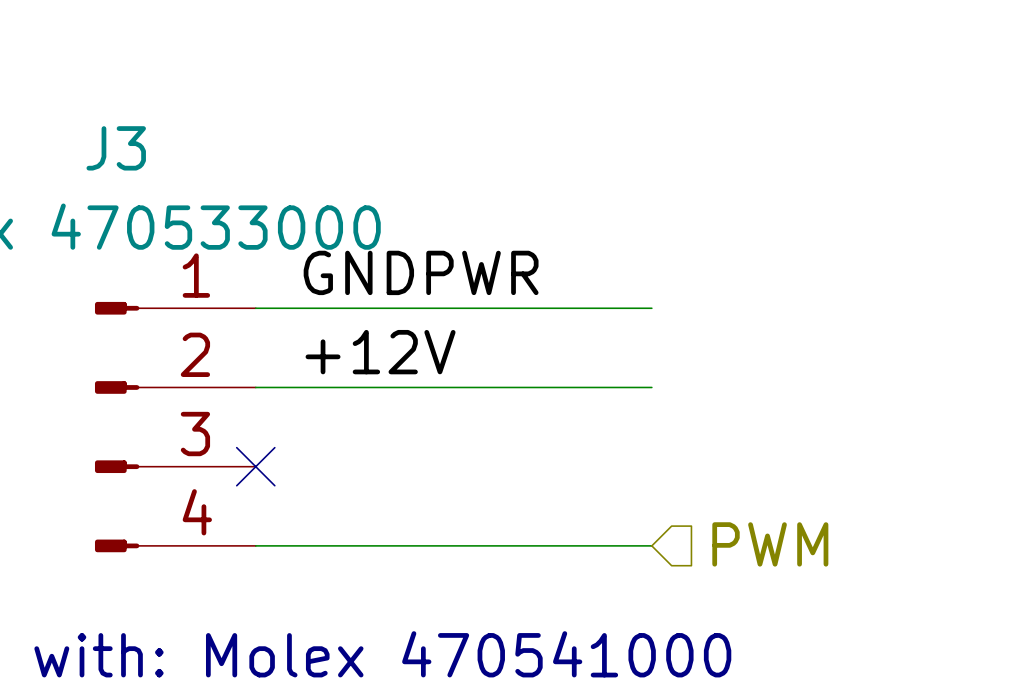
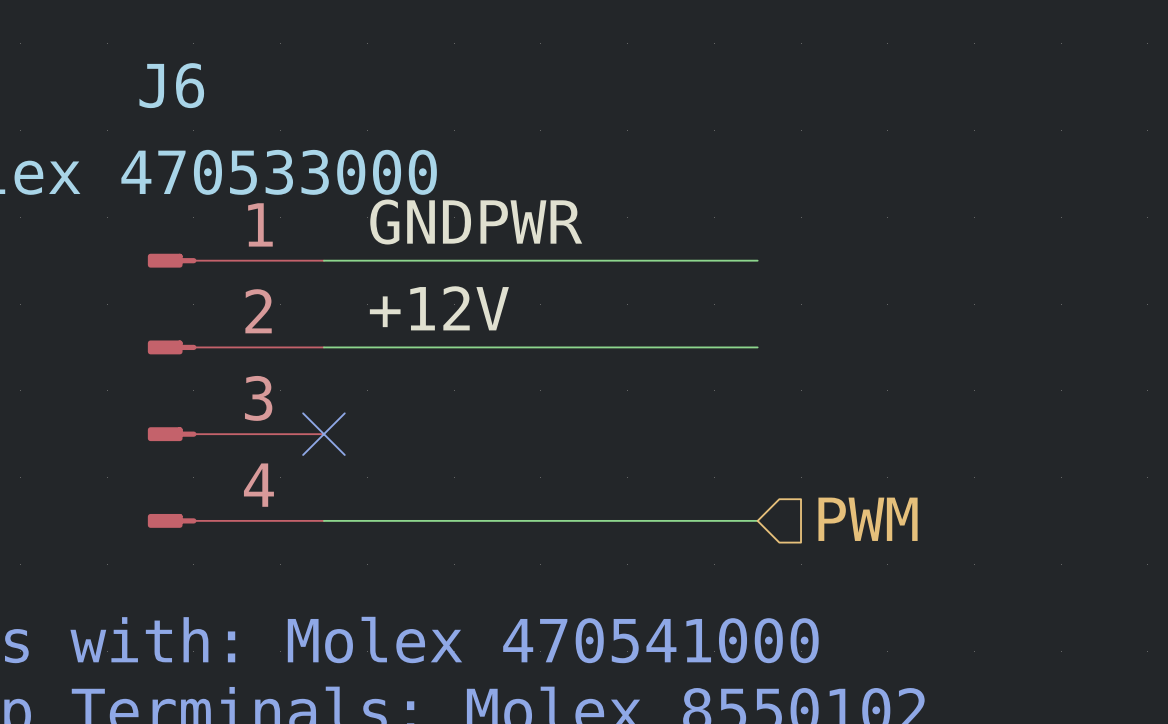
J3 name: J3 (116, 148) -> J6 (171, 85)

